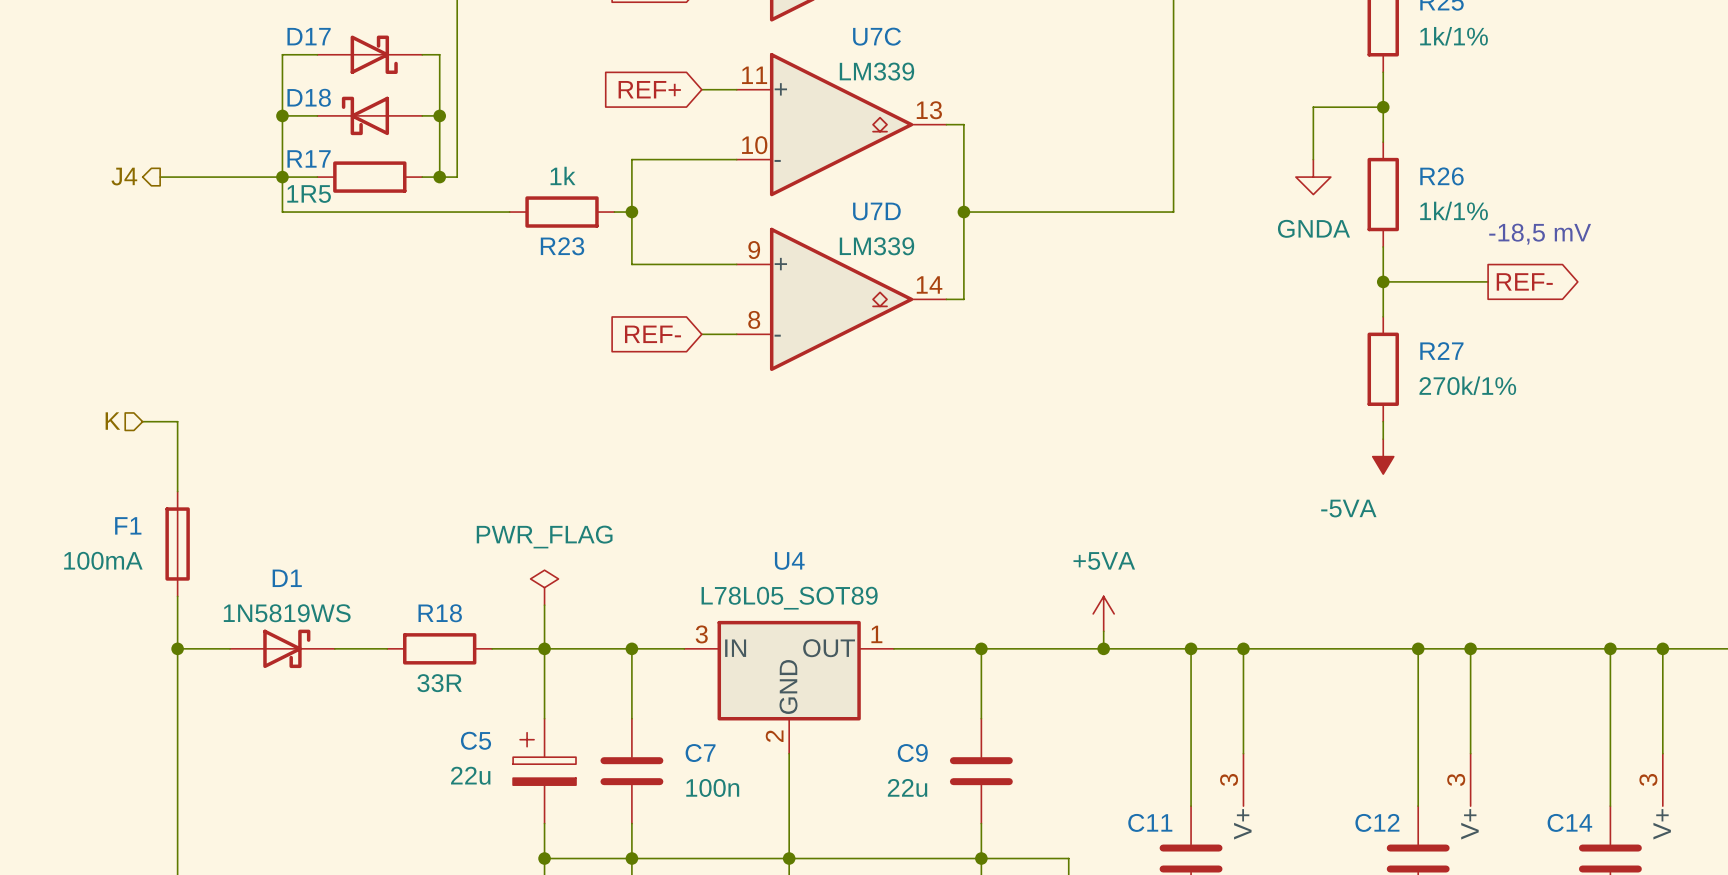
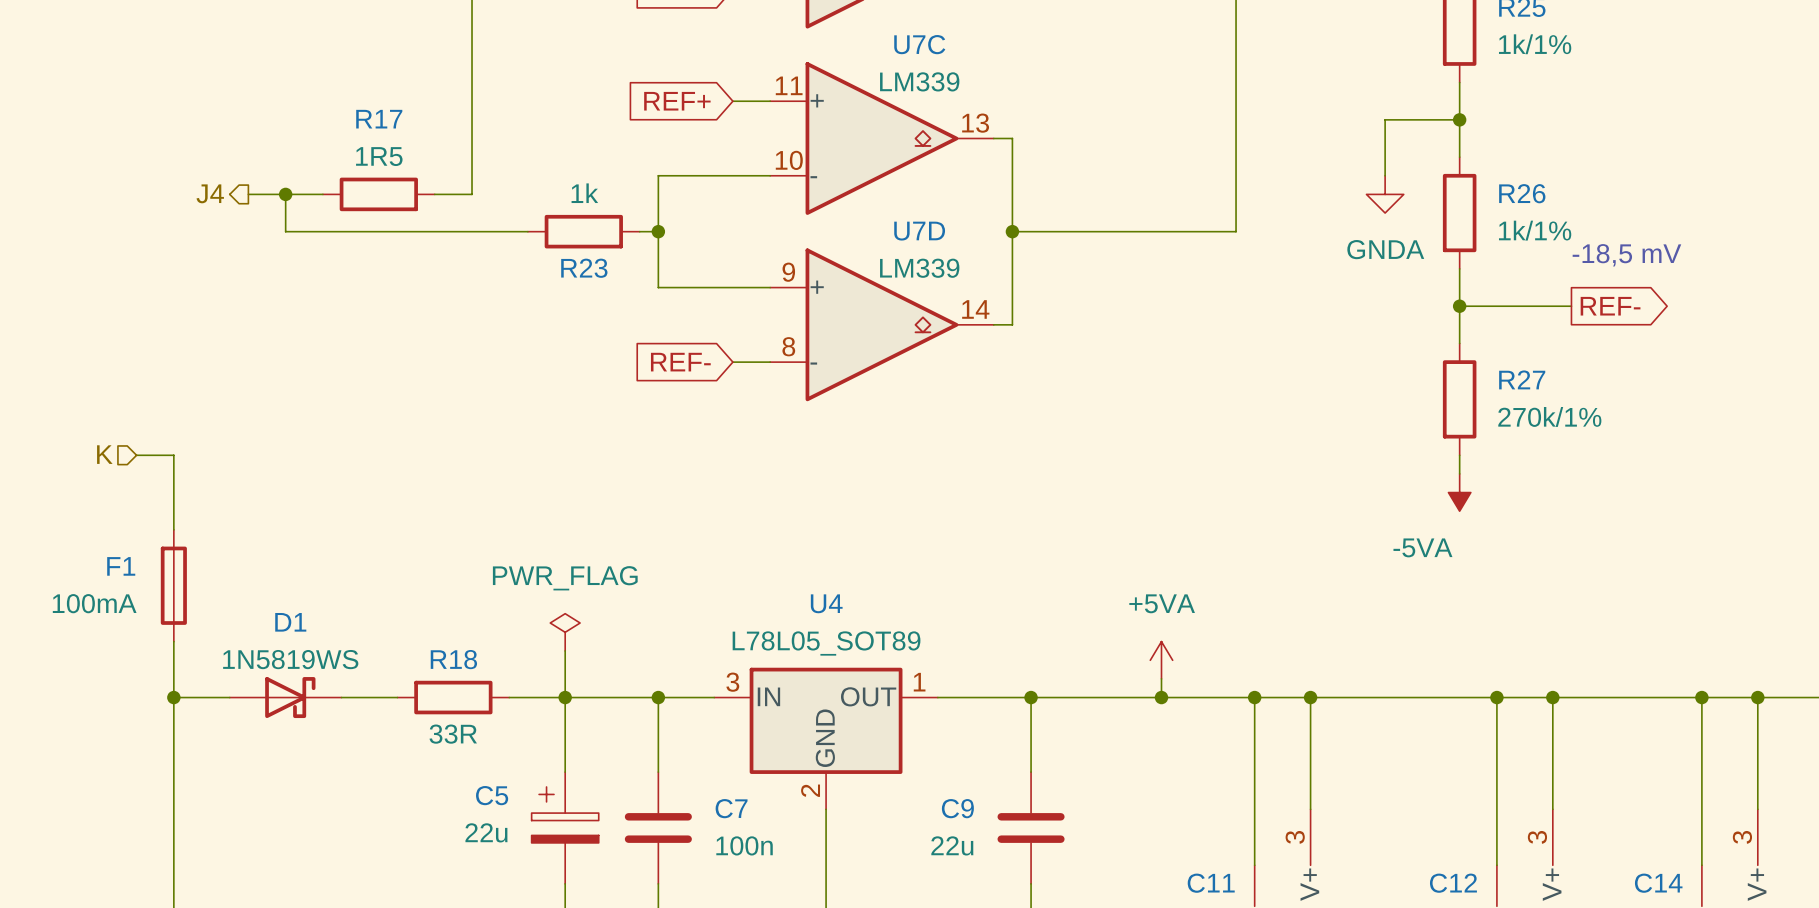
wire: (317, 54) (282, 54) (282, 177) -> none
D17: (369, 54) -> none
wire: (422, 54) (439, 54) (439, 177) -> none
wire: (282, 115) (317, 115) -> none
junction: (282, 115) -> none
D18: (369, 115) -> none
wire: (422, 115) (439, 115) -> none
junction: (439, 115) -> none
R17 name position: R17 (309, 158) -> R17 (379, 119)
hierarchical label position: J4 (124, 176) -> J4 (210, 193)
wire: (160, 177) (247, 177) -> none
junction: (439, 177) -> none
R17 value position: 1R5 (309, 194) -> 1R5 (379, 156)

